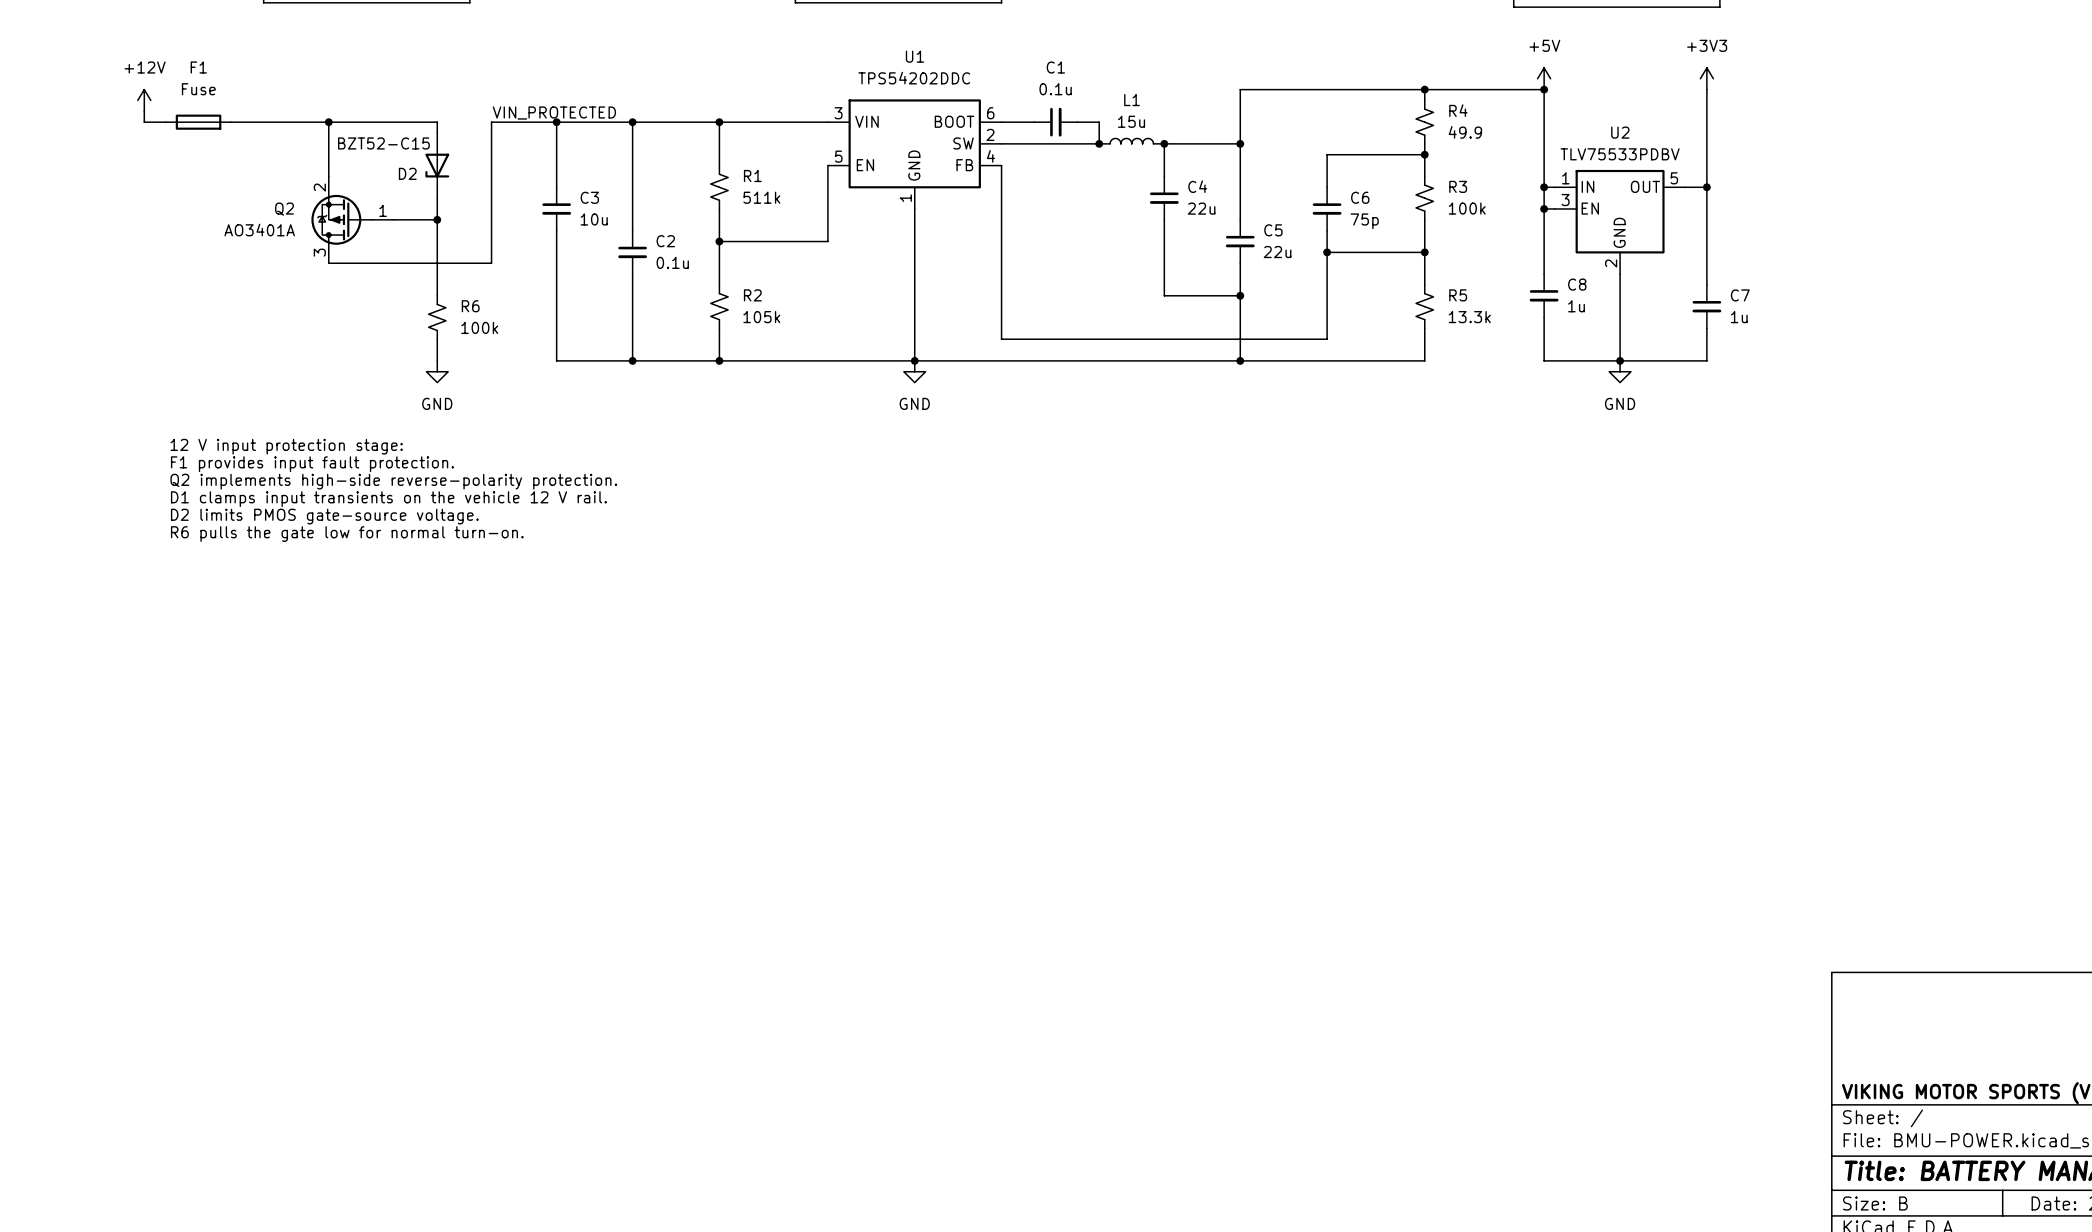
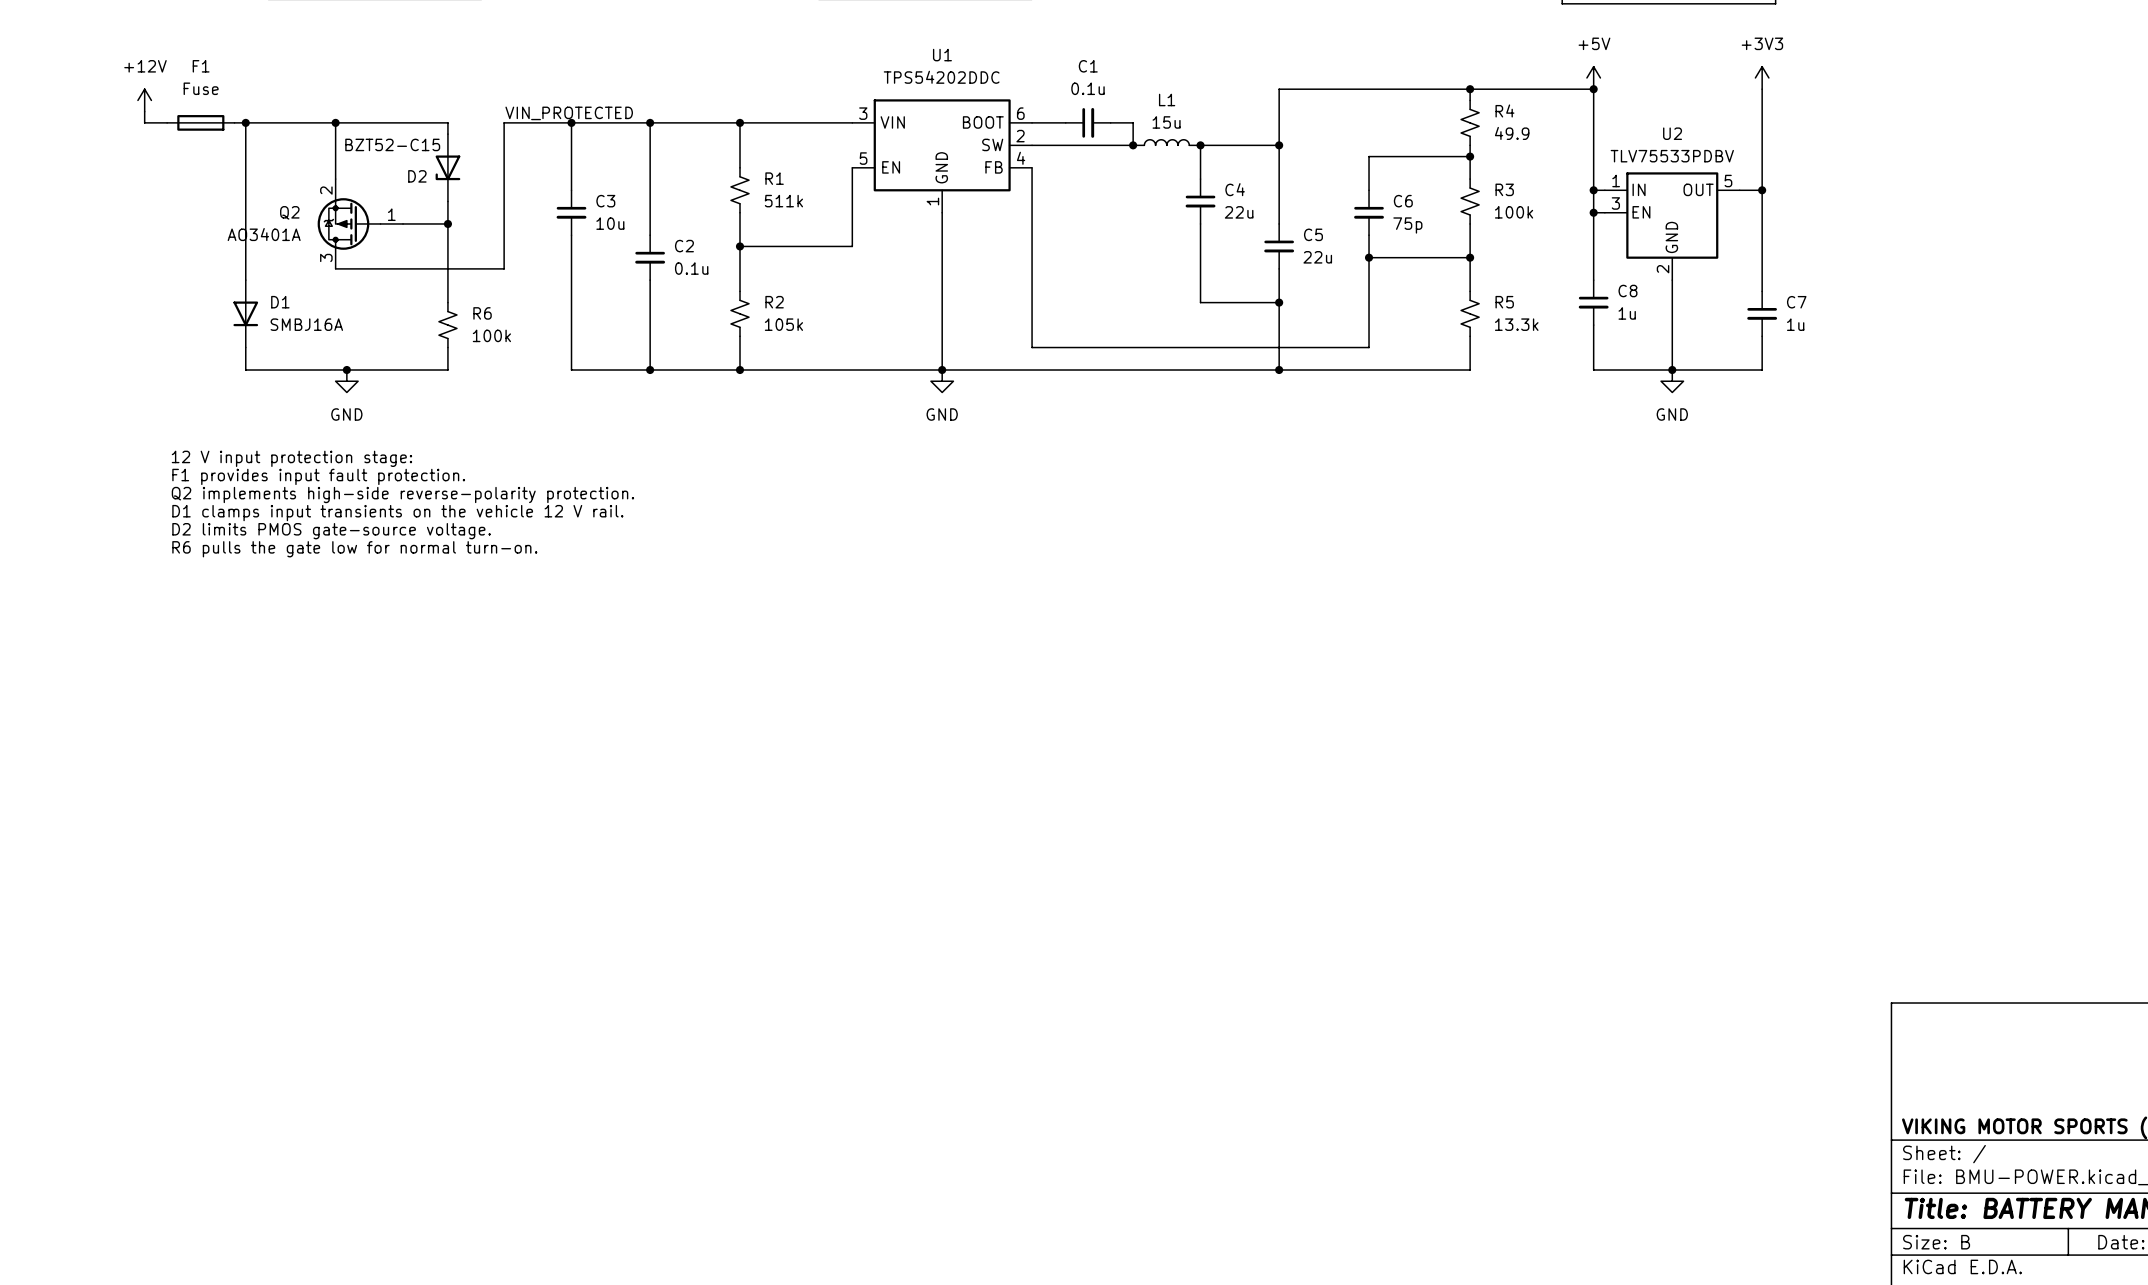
wire: none -> (245, 122) (245, 280)
junction: none -> (245, 122)
D1: none -> SMBJ16A (245, 313)
wire: none -> (245, 347) (245, 370) (447, 370)
junction: none -> (346, 370)
power symbol position: GND (437, 371) -> GND (346, 381)

